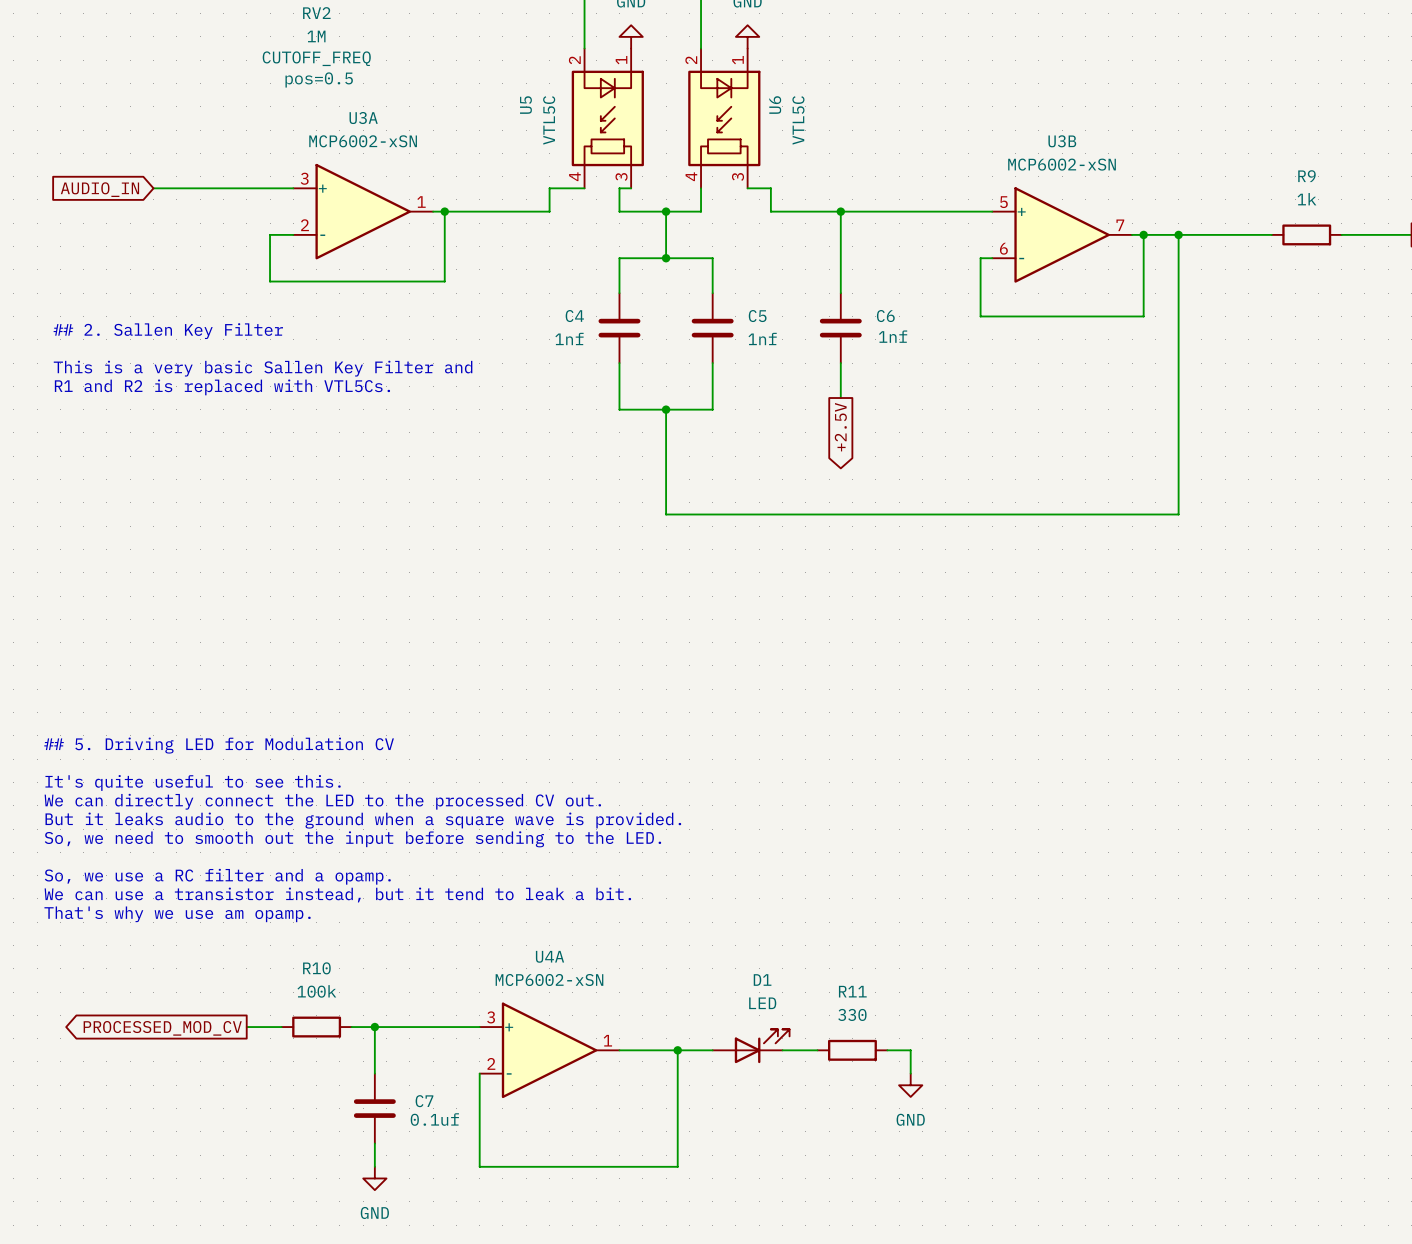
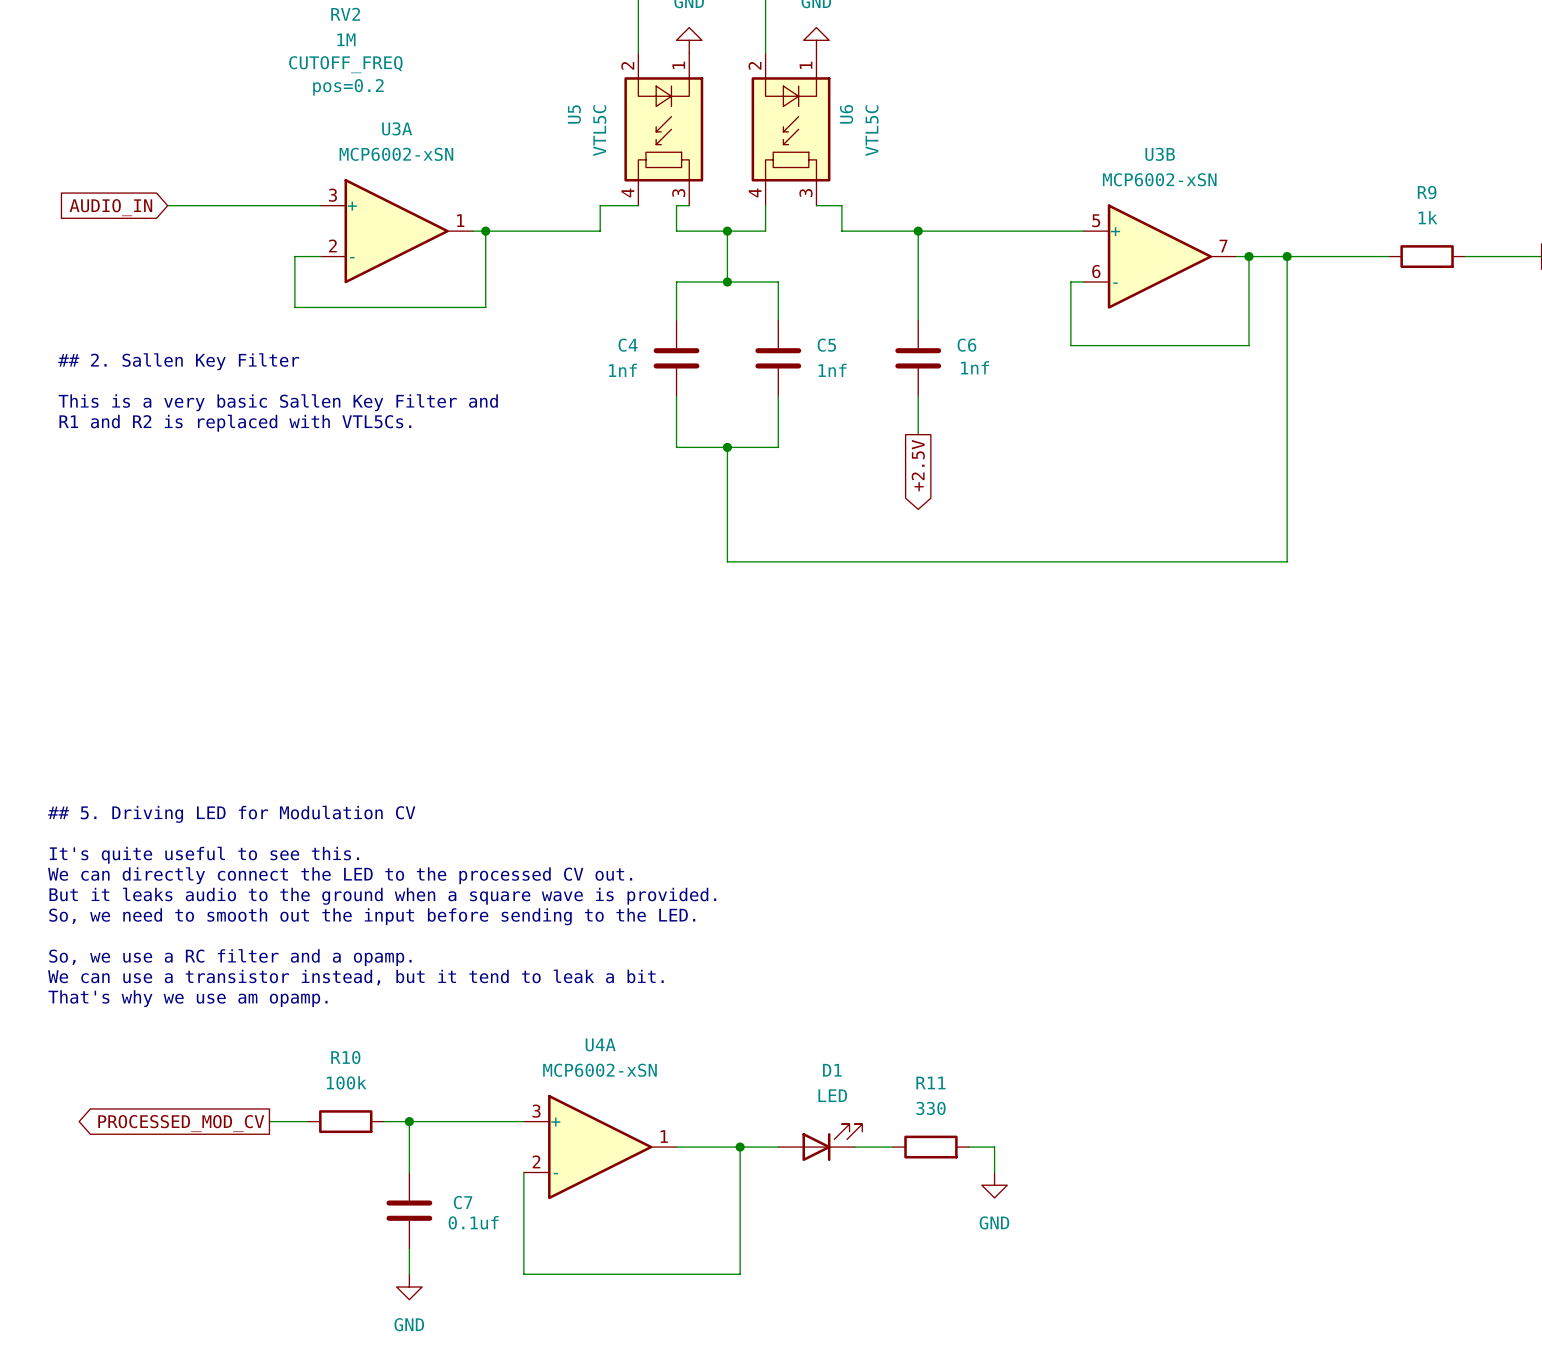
RV2 text: pos=0.5 (319, 79) -> pos=0.2 (348, 87)

